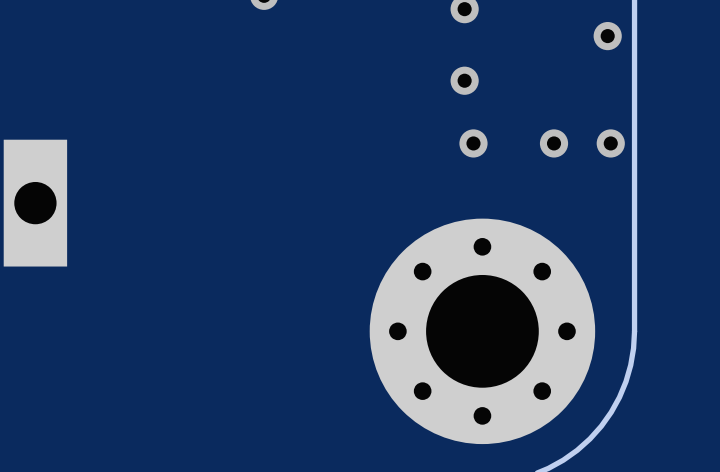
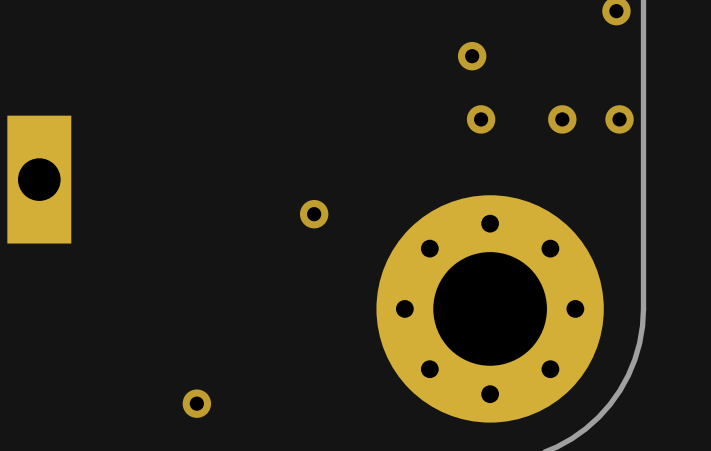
via: none -> (314, 214)
via: none -> (196, 403)

